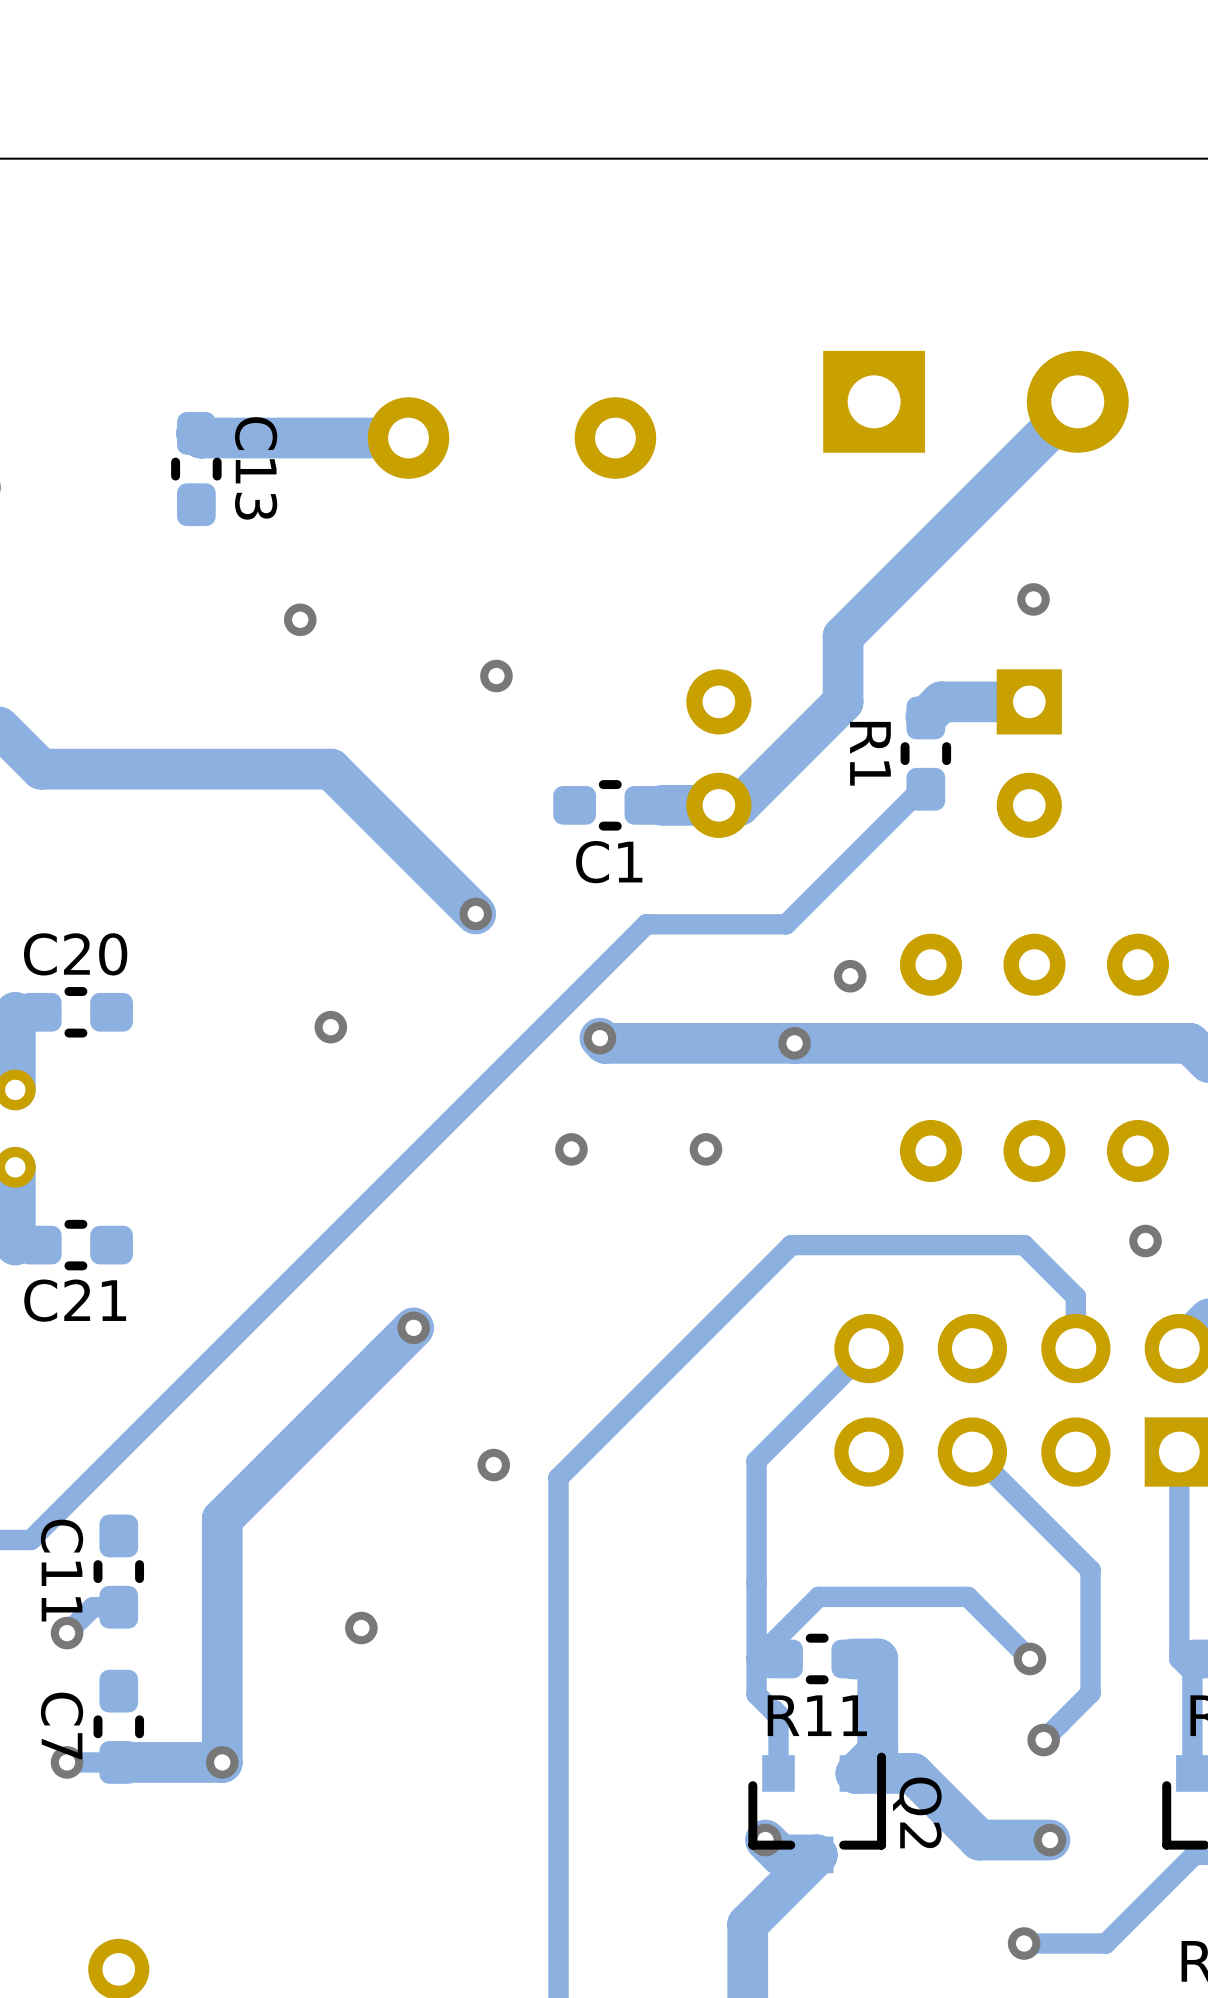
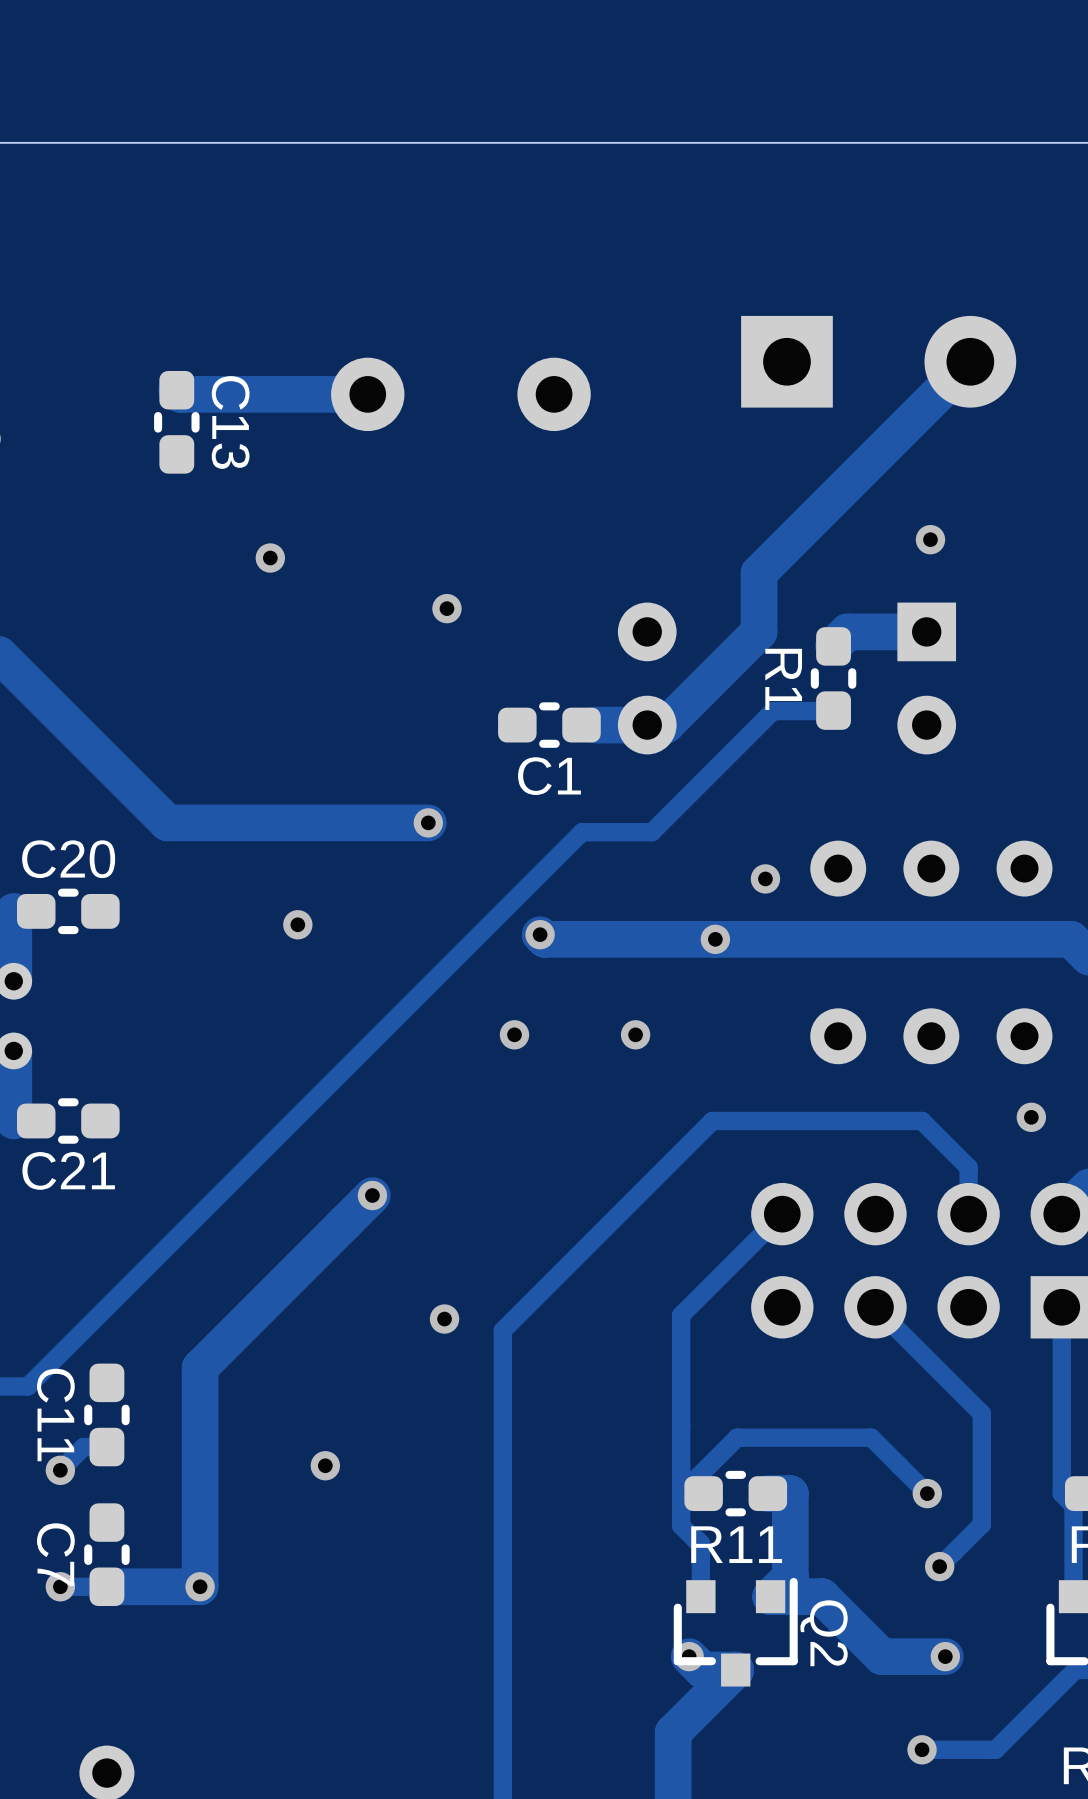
track: (41, 769) (330, 769) (475, 913) -> (37, 692) (167, 822) (428, 822)
track: (920, 789) (786, 924) (724, 924) -> (828, 711) (773, 711) (651, 832)

